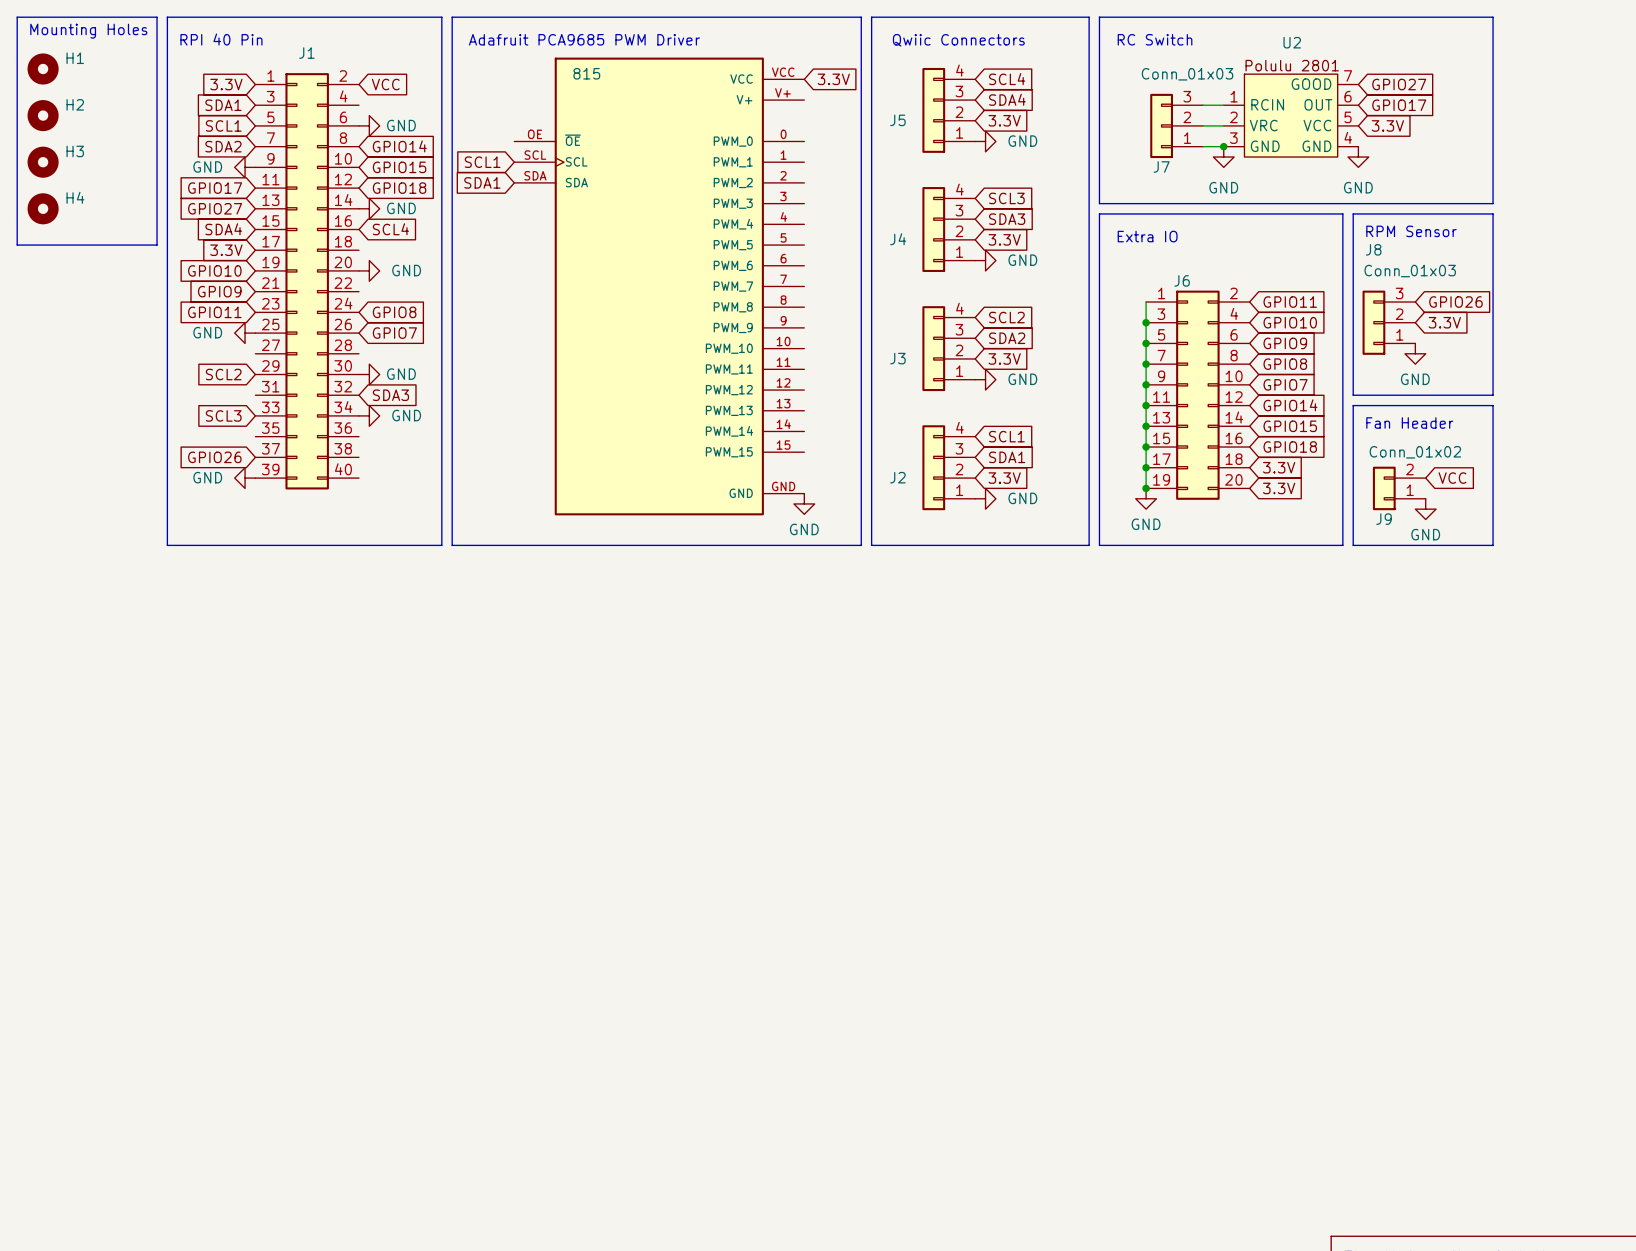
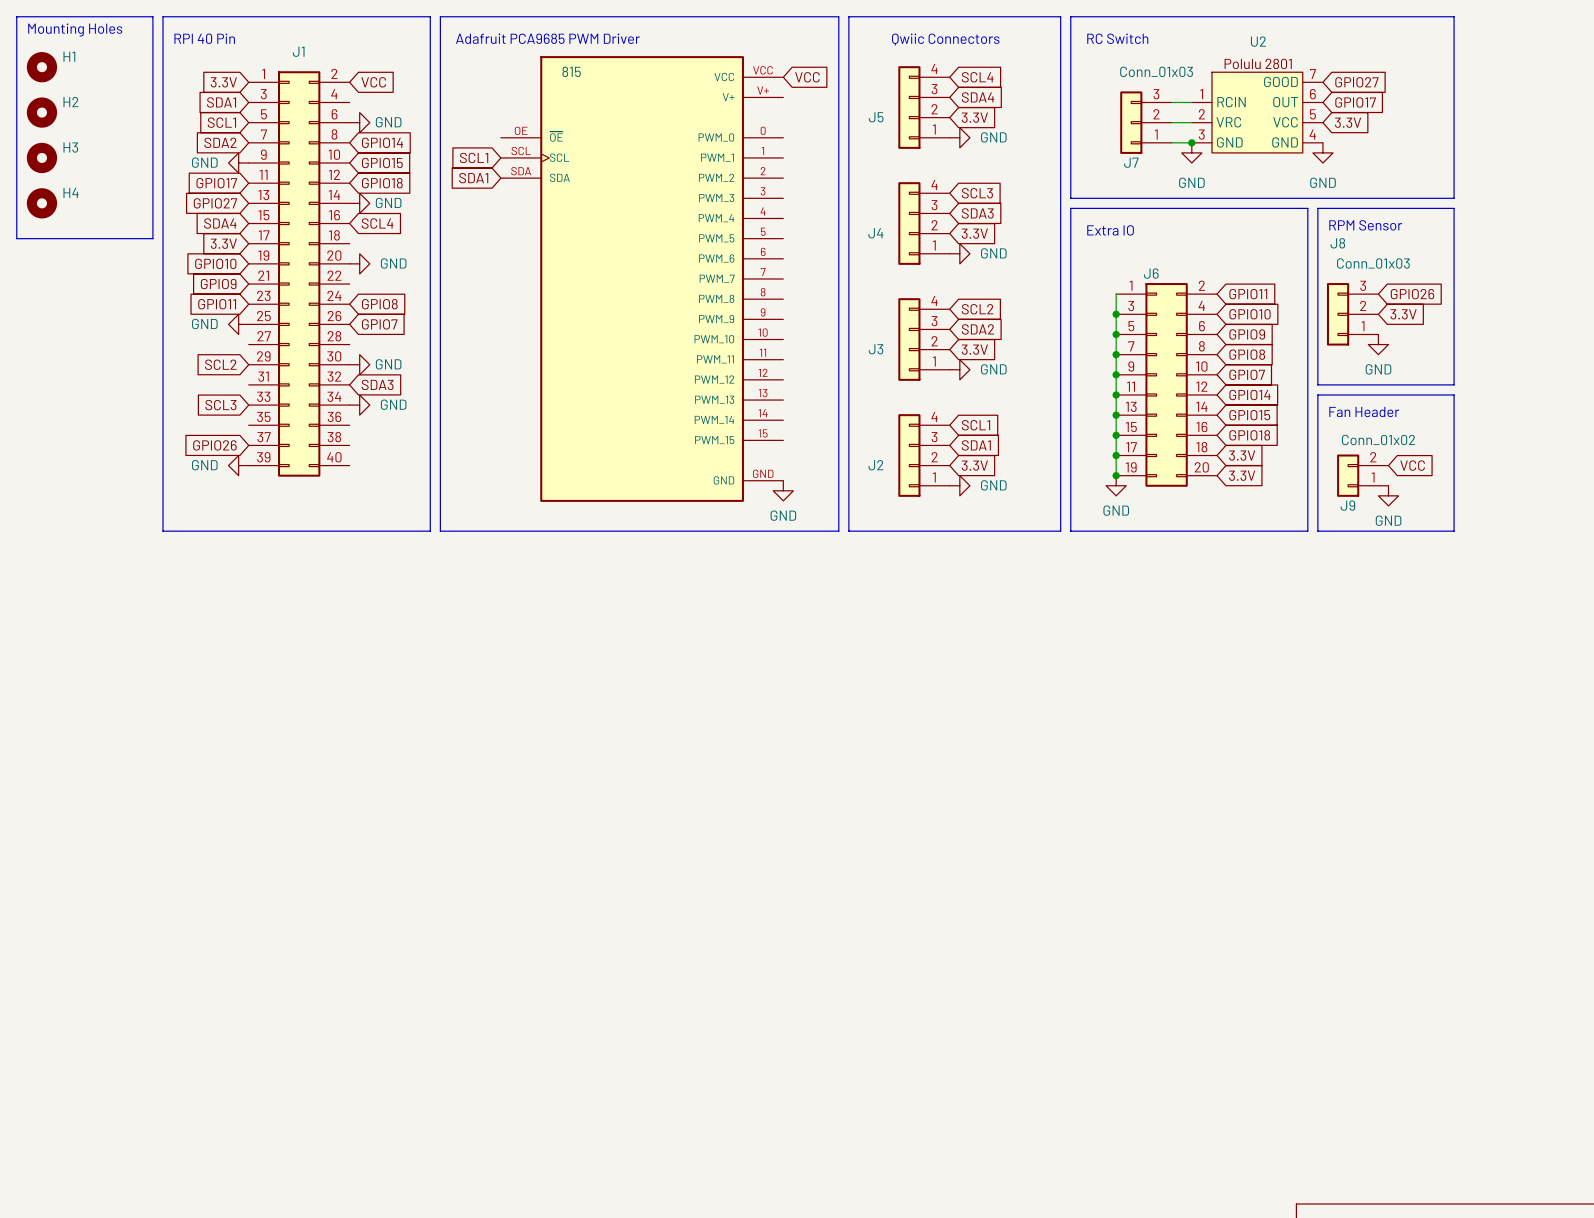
global label: 3.3V (833, 79) -> VCC (807, 77)

